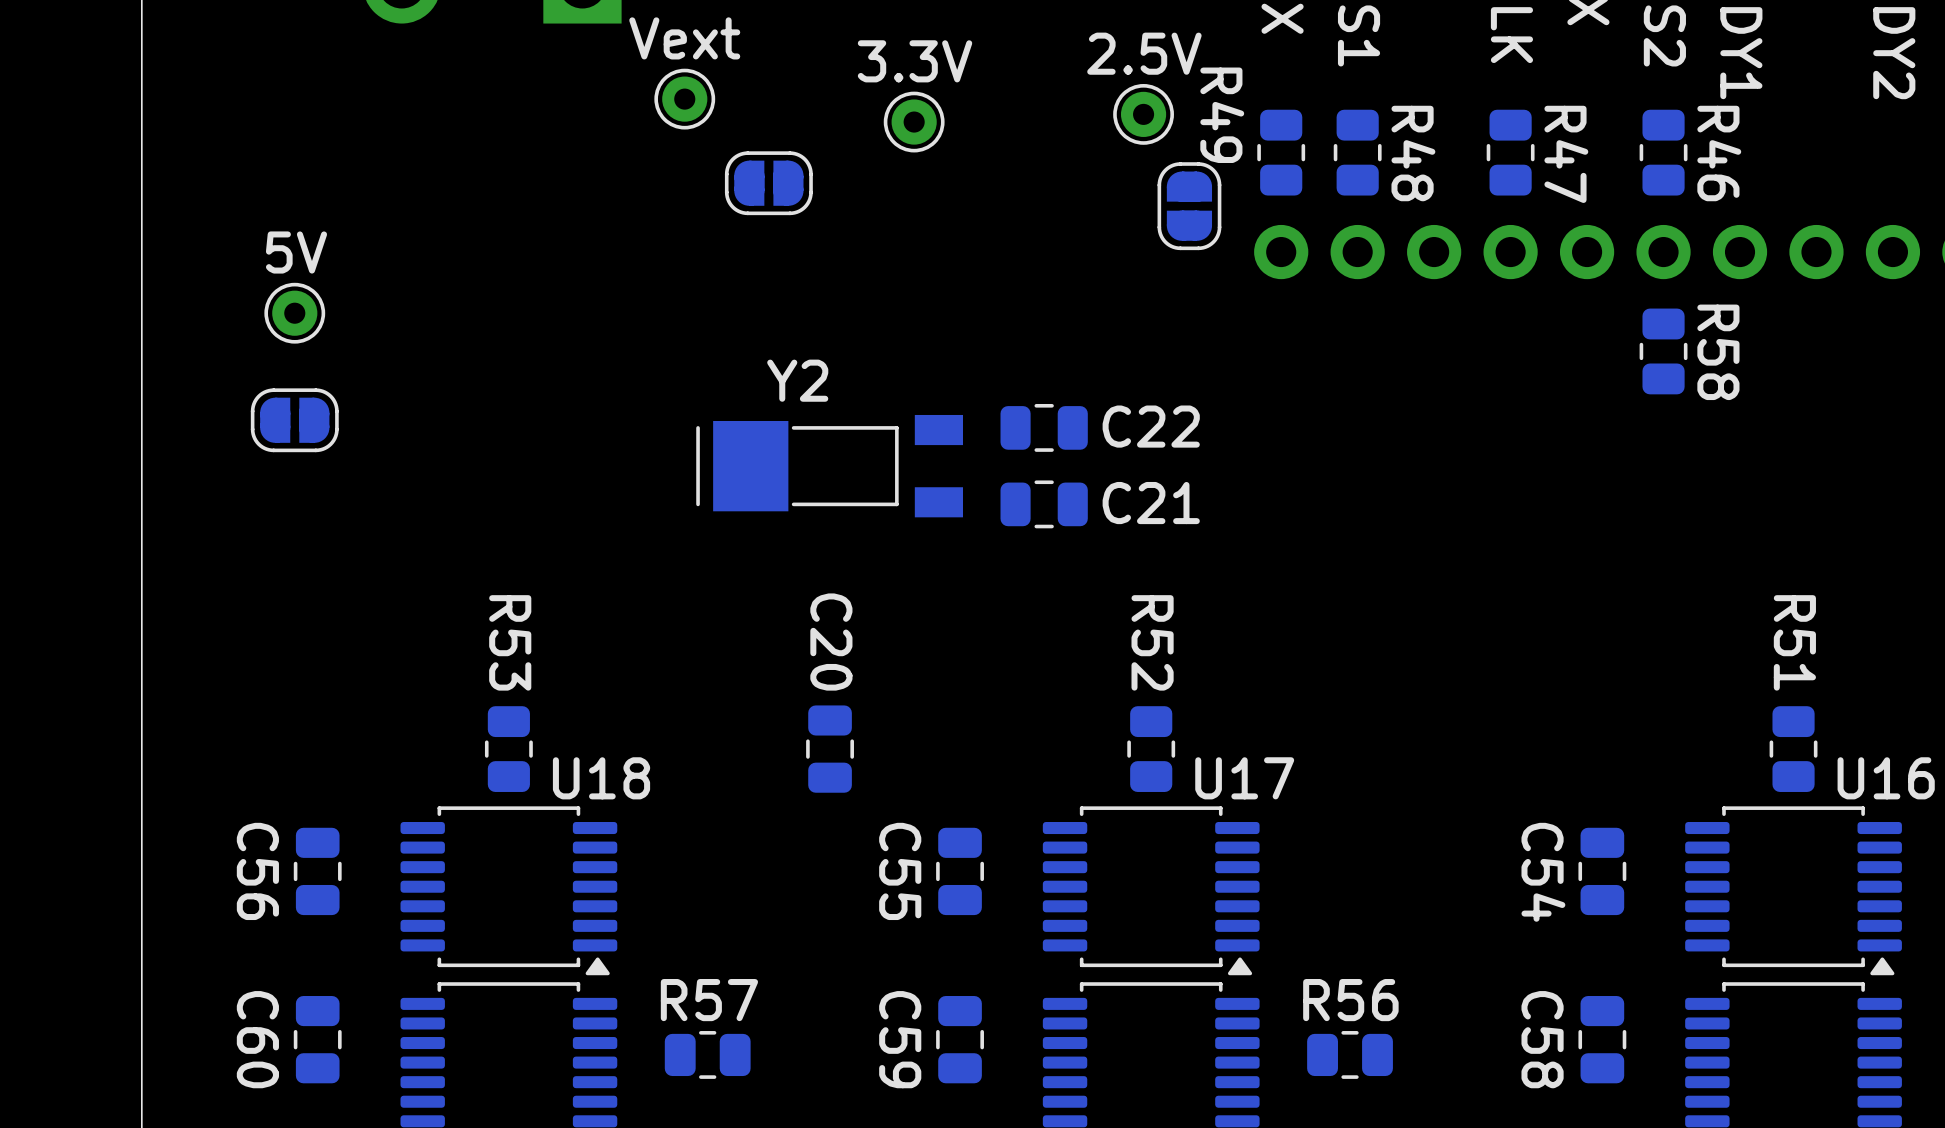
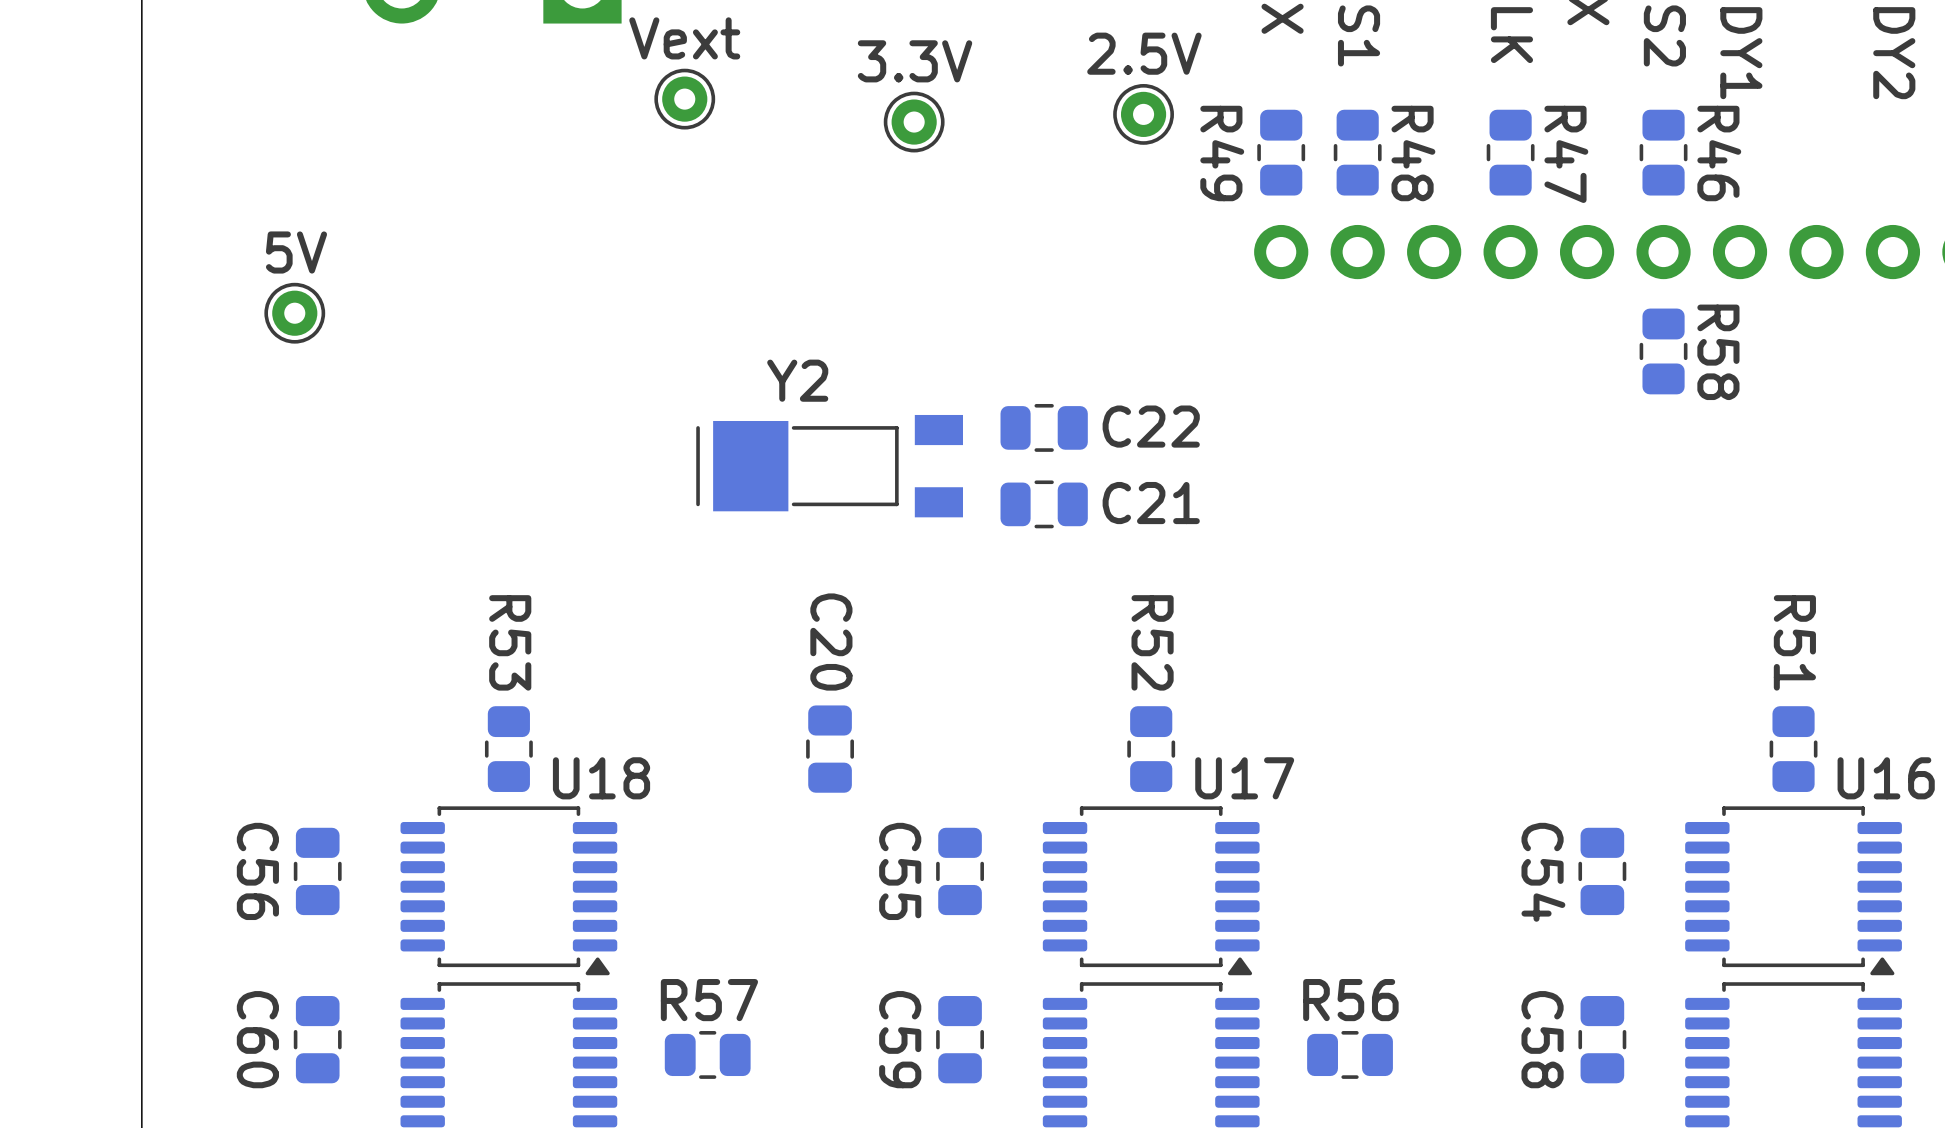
R49 name position: R49 (1222, 115) -> R49 (1222, 153)
part: (768, 183) -> none
part: (1189, 206) -> none
part: (294, 420) -> none

